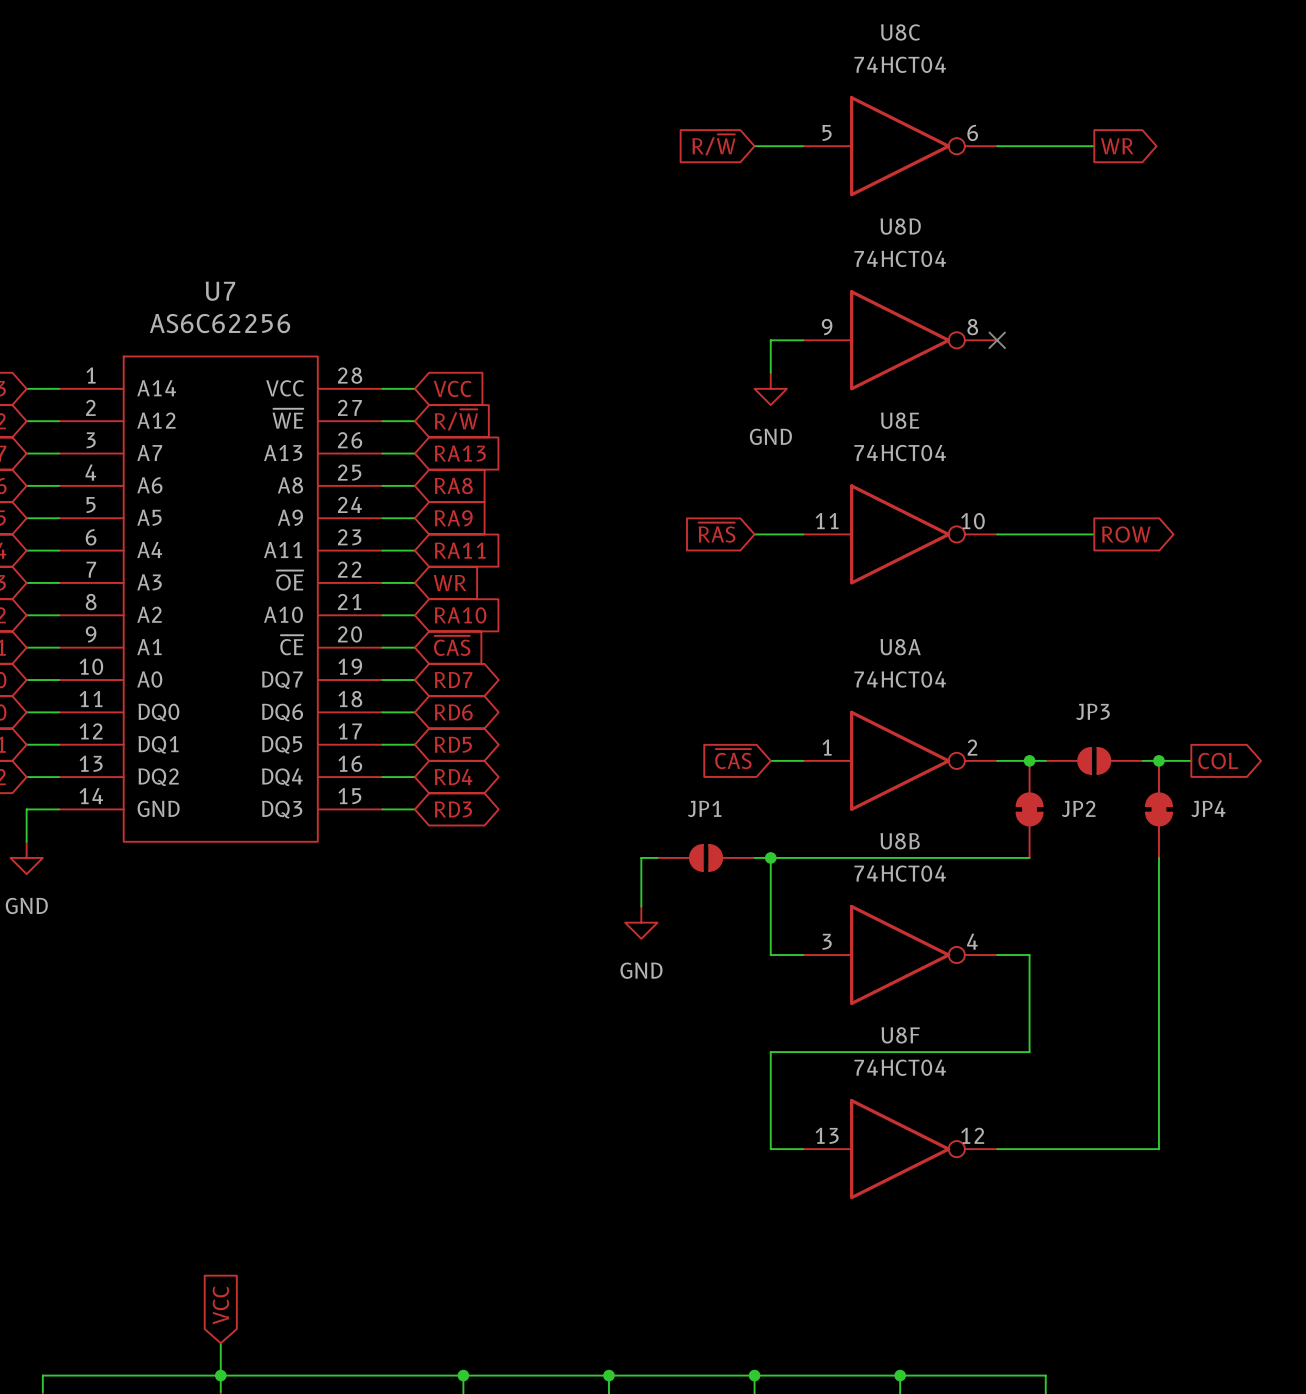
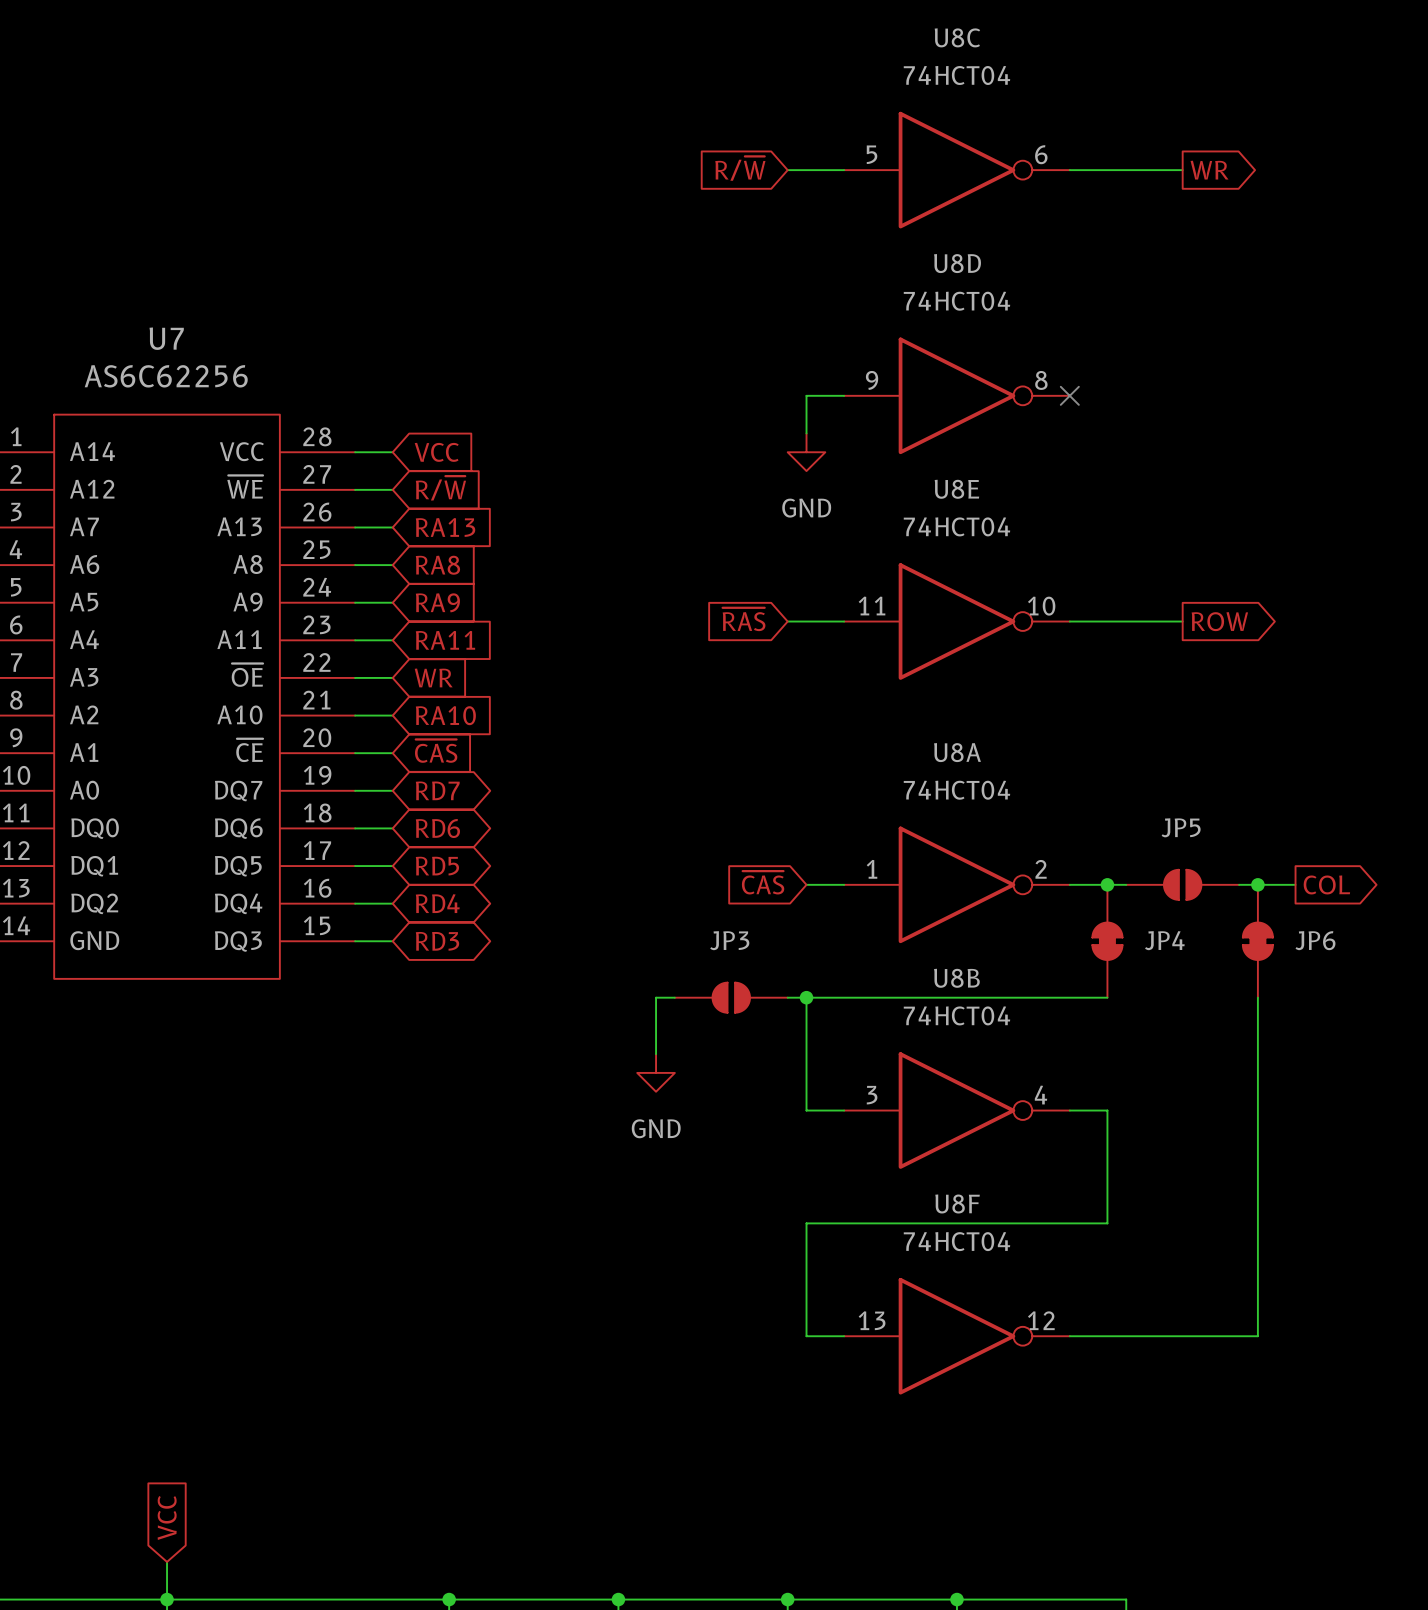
JP3 name: JP3 (1092, 711) -> JP5 (1181, 827)
JP1 name: JP1 (704, 808) -> JP3 (729, 940)
JP2 name: JP2 (1078, 808) -> JP4 (1164, 940)
JP4 name: JP4 (1208, 808) -> JP6 (1315, 940)

